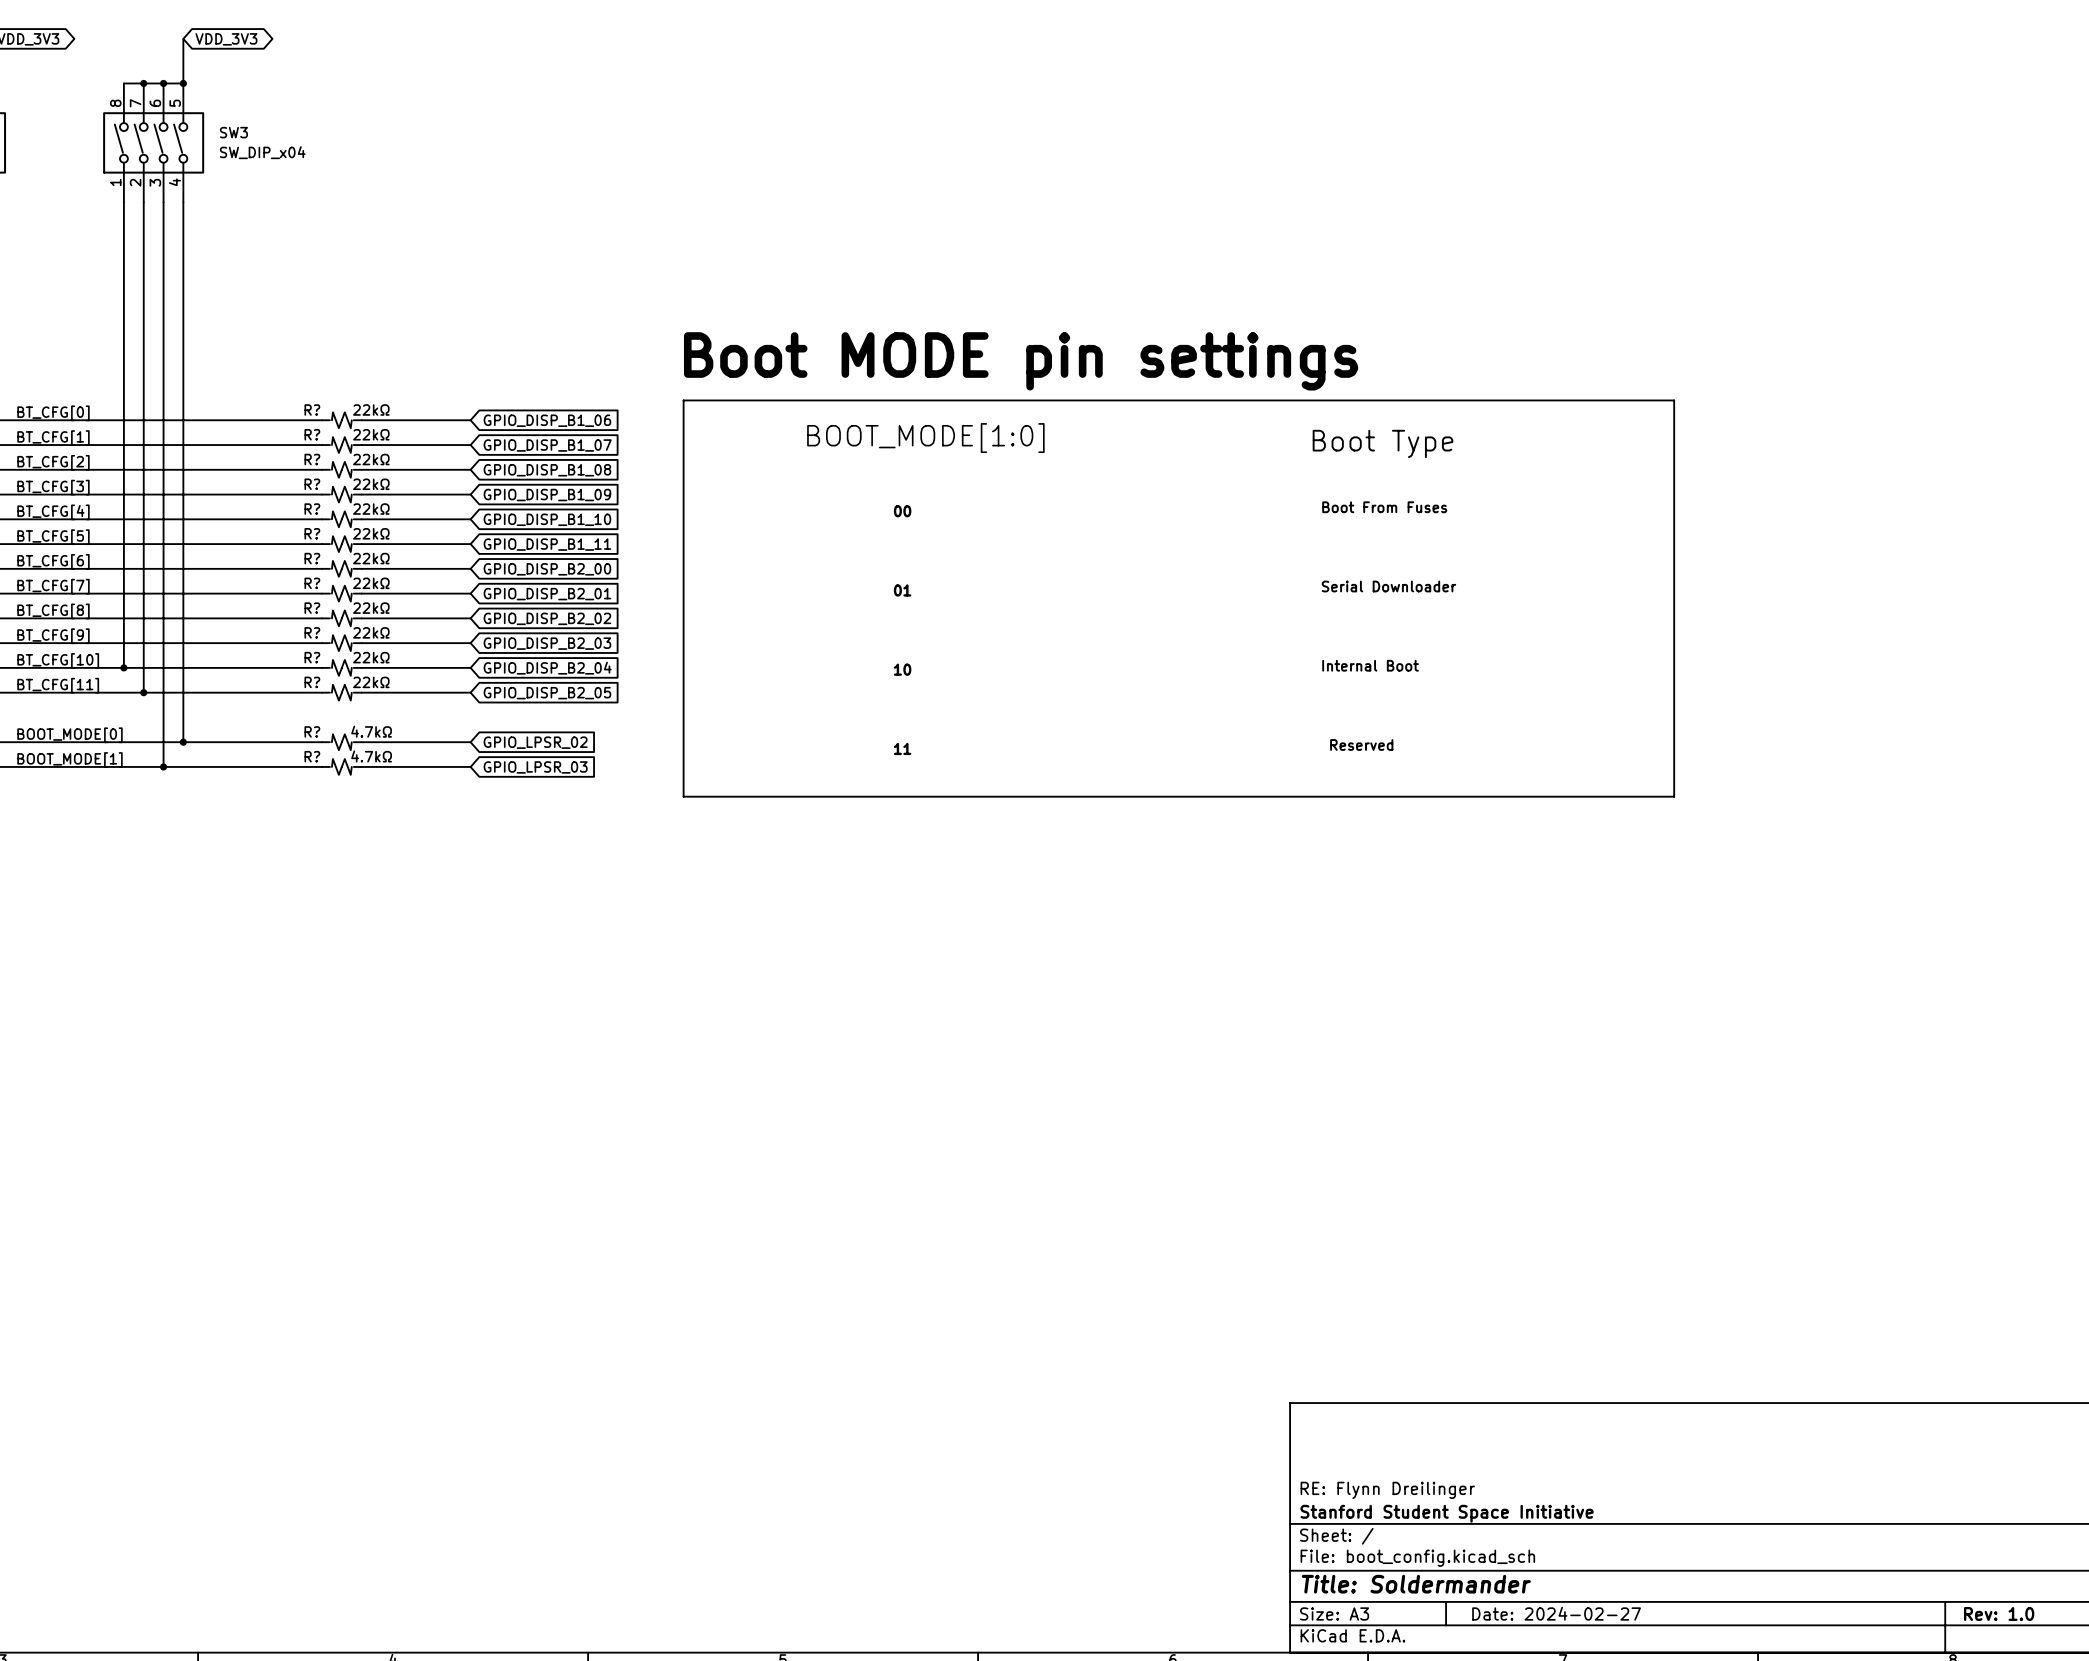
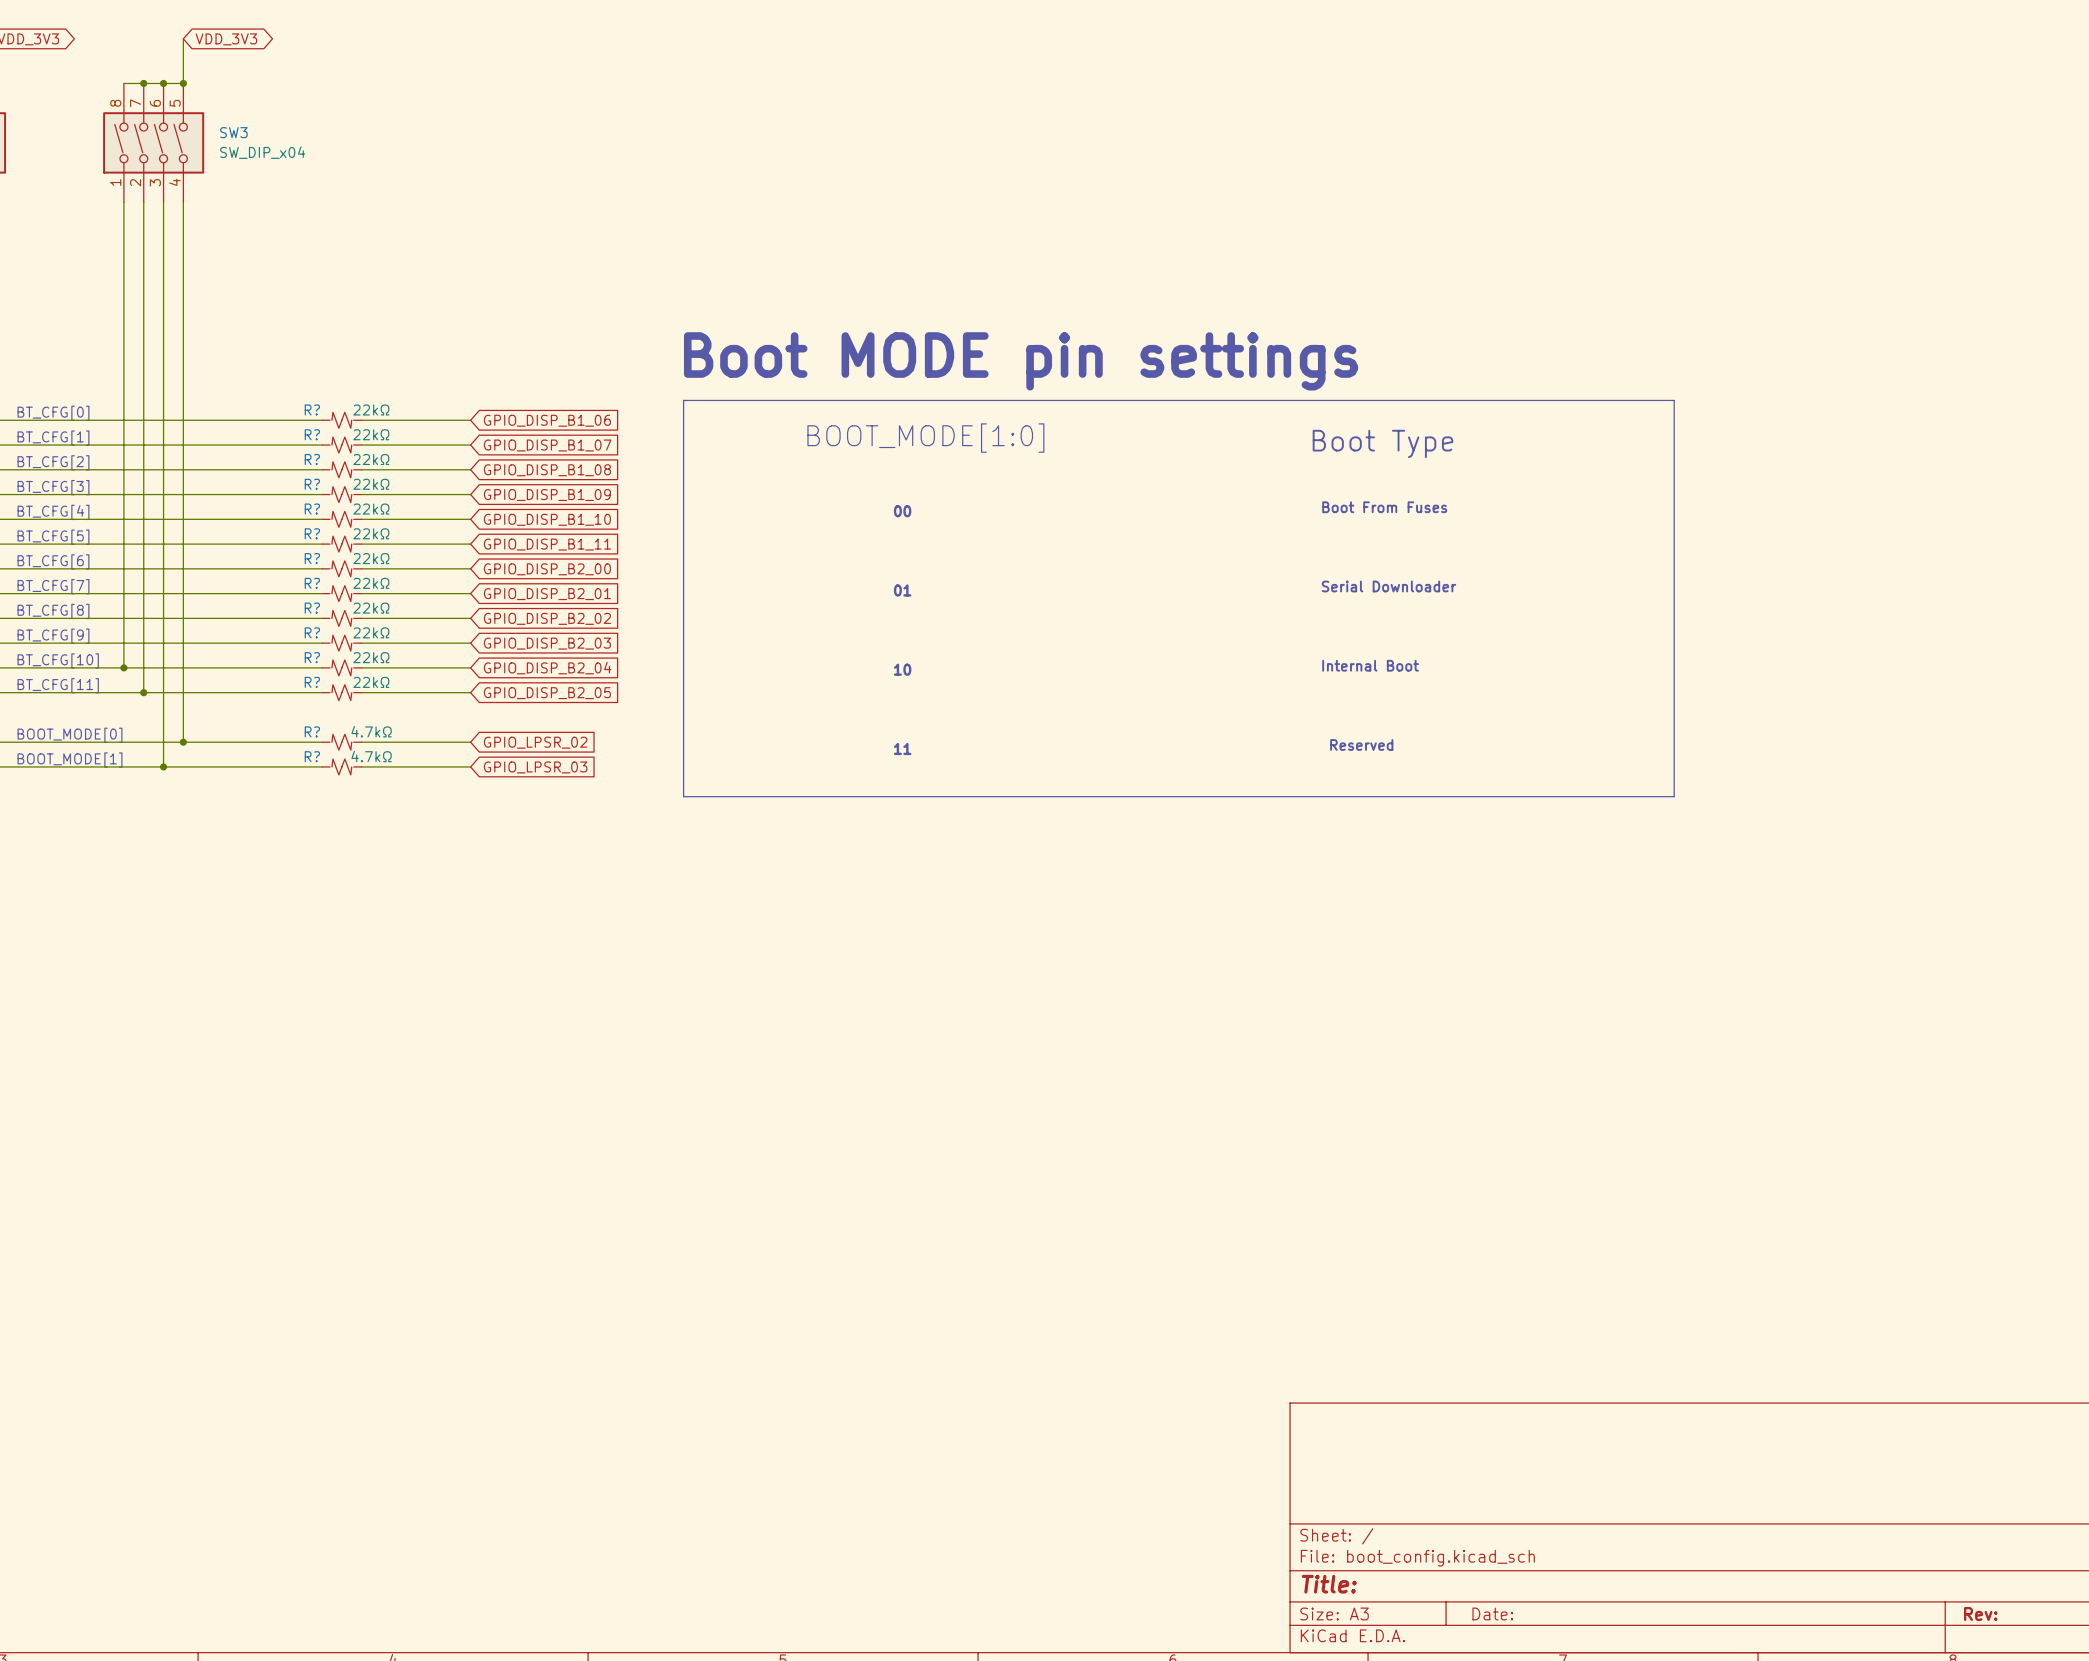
title block: RE: Flynn Dreilinger (1387, 1490) -> none
title block: Stanford Student Space Initiative (1447, 1513) -> none
title block: Title: Soldermander (1416, 1584) -> Title: (1329, 1584)
title block: Date: 2024-02-27 (1556, 1613) -> Date: (1492, 1613)
title block: Rev: 1.0 (1999, 1613) -> Rev: (1980, 1613)

